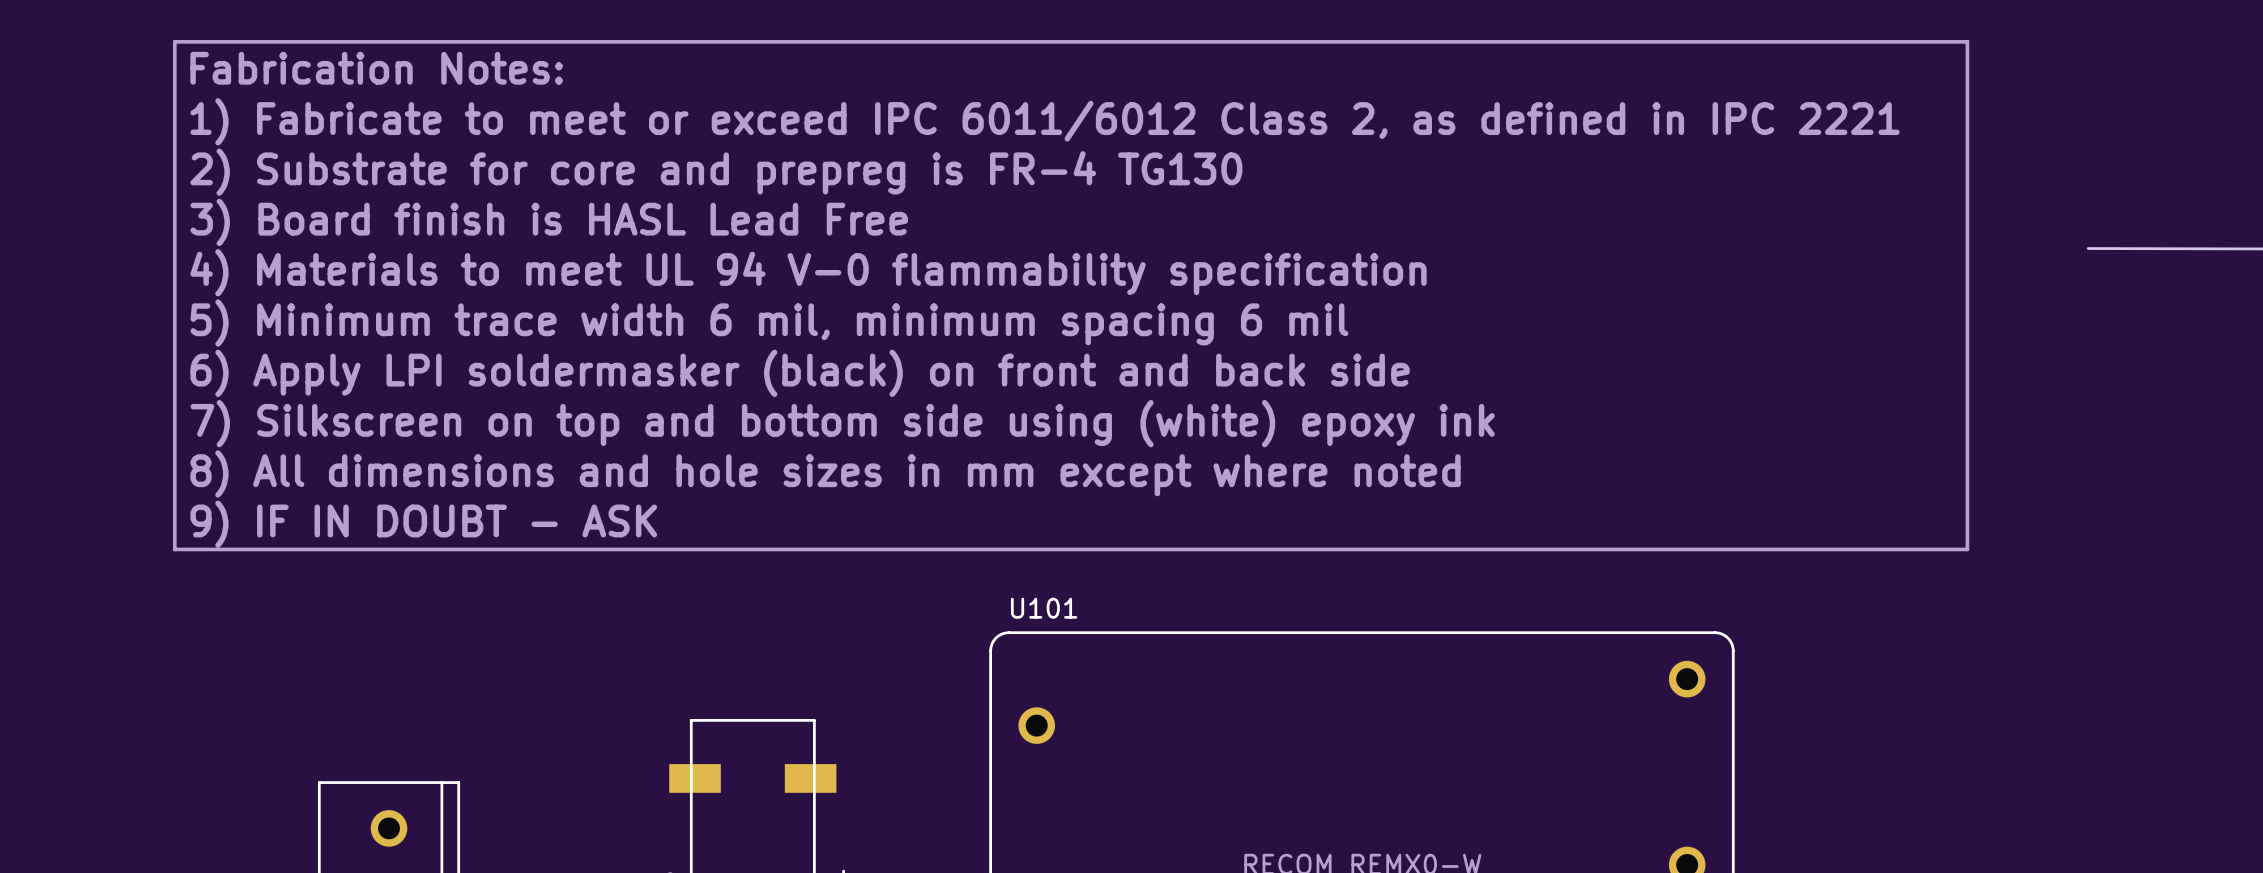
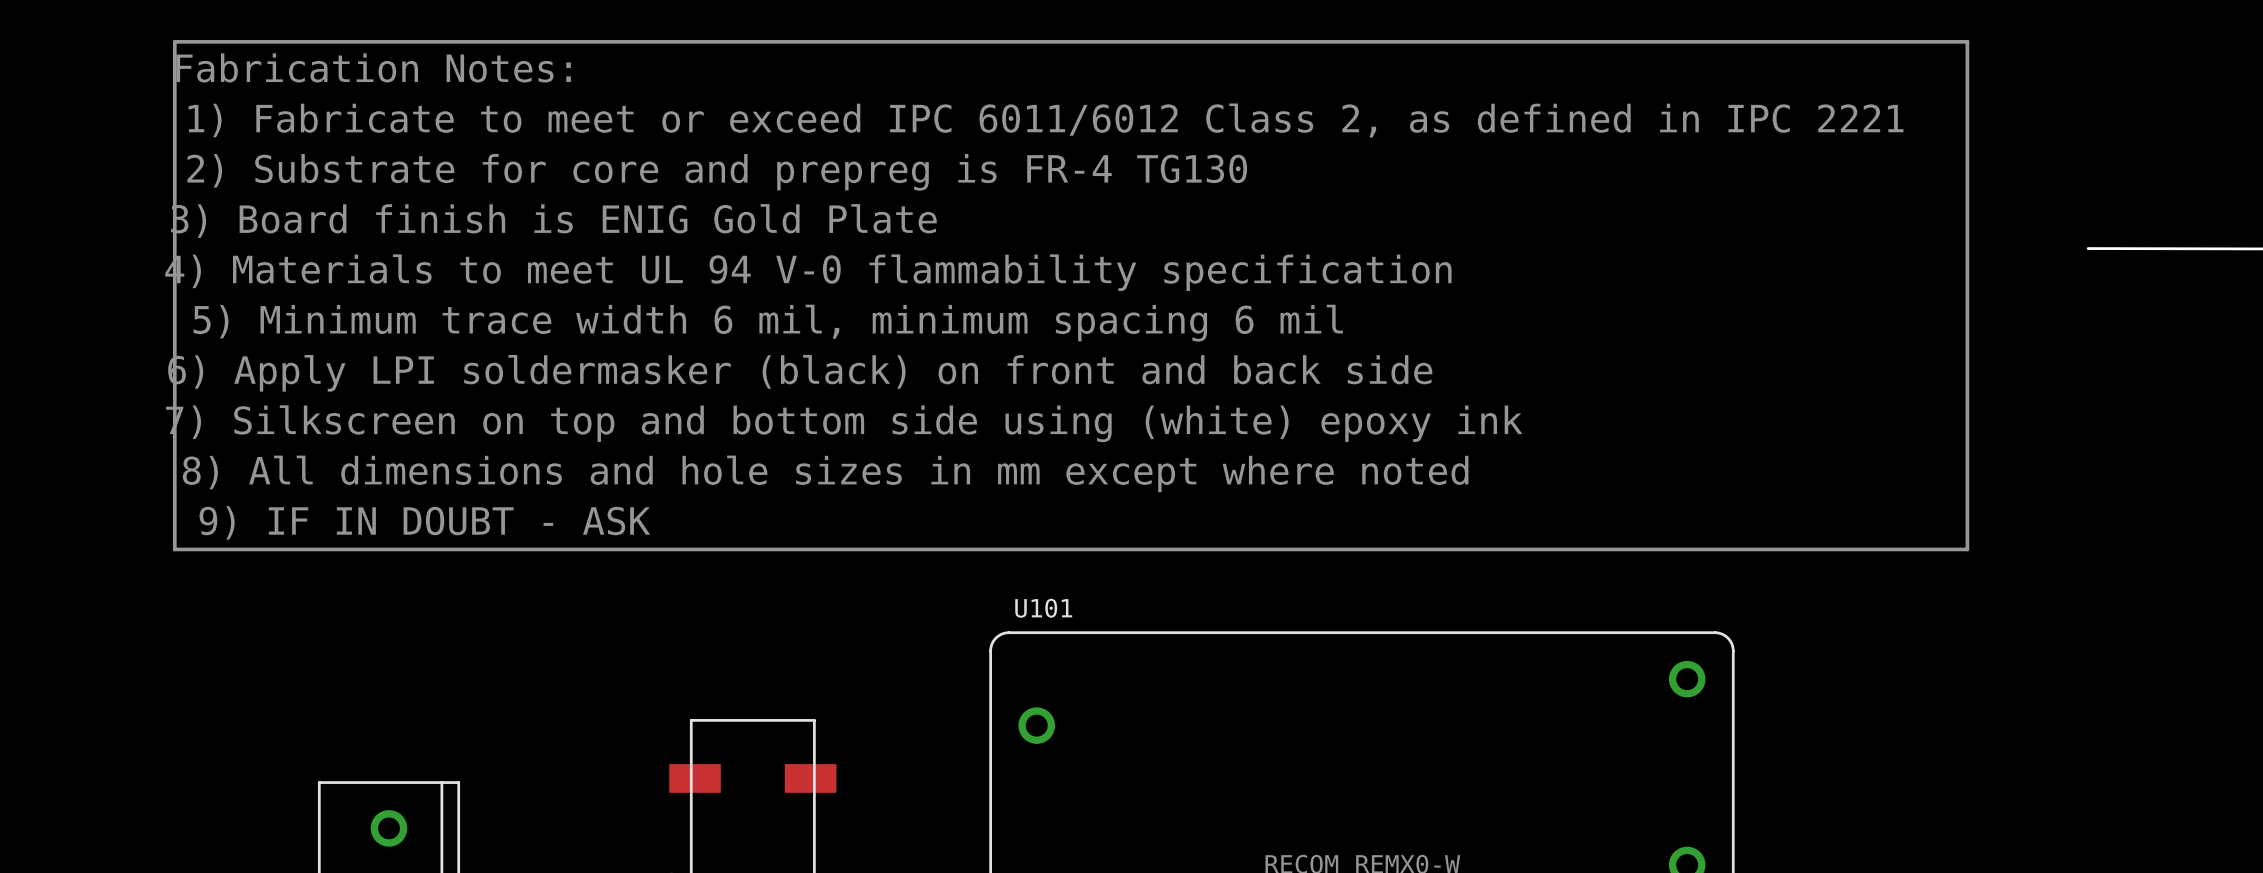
drawing shape: [172, 40, 1970, 552] -> [165, 40, 1970, 552]

